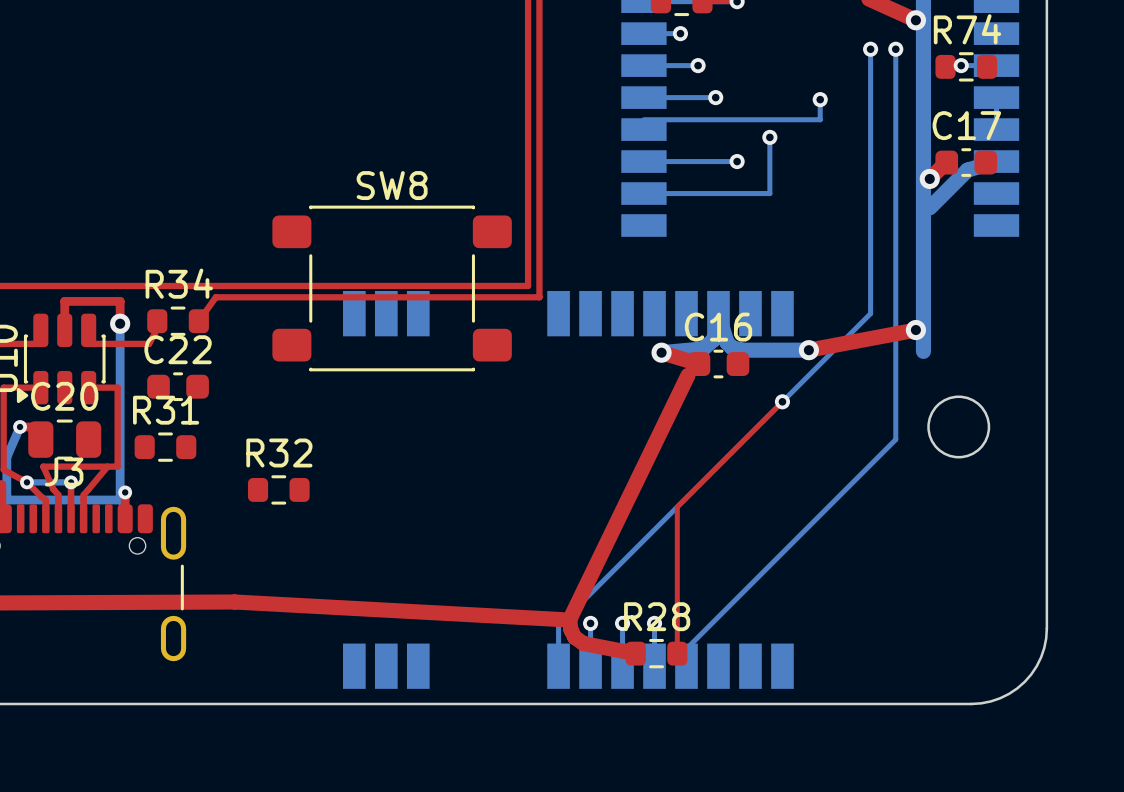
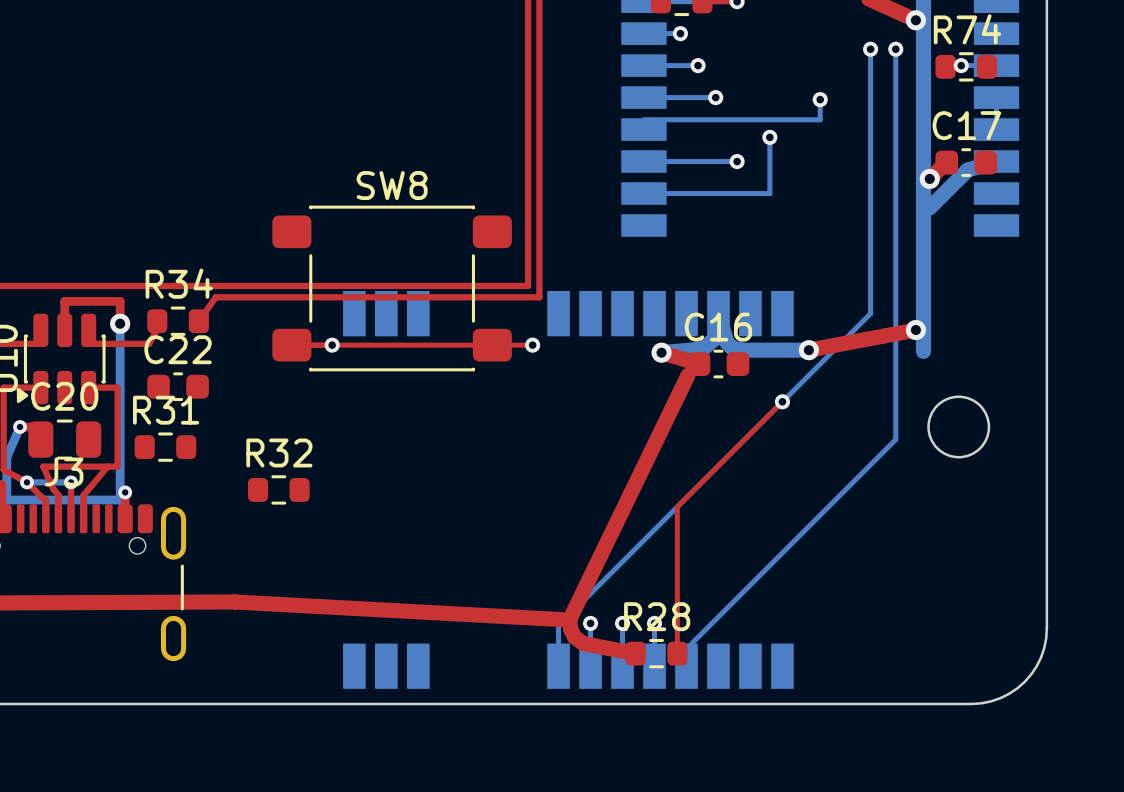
top track: none -> (291, 345) (532, 345)
via: none -> (332, 345)
via: none -> (532, 345)

